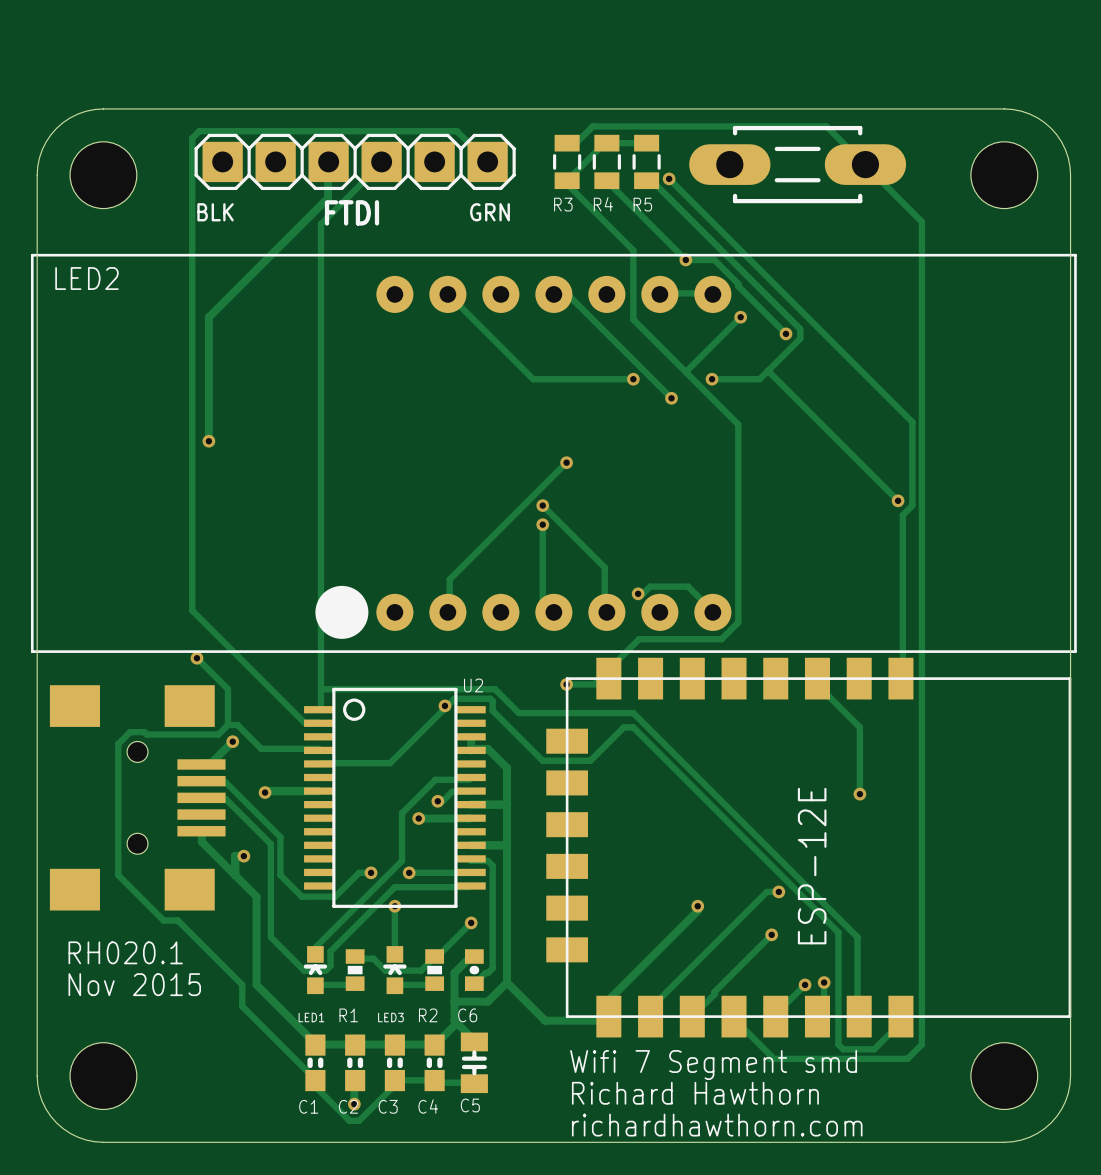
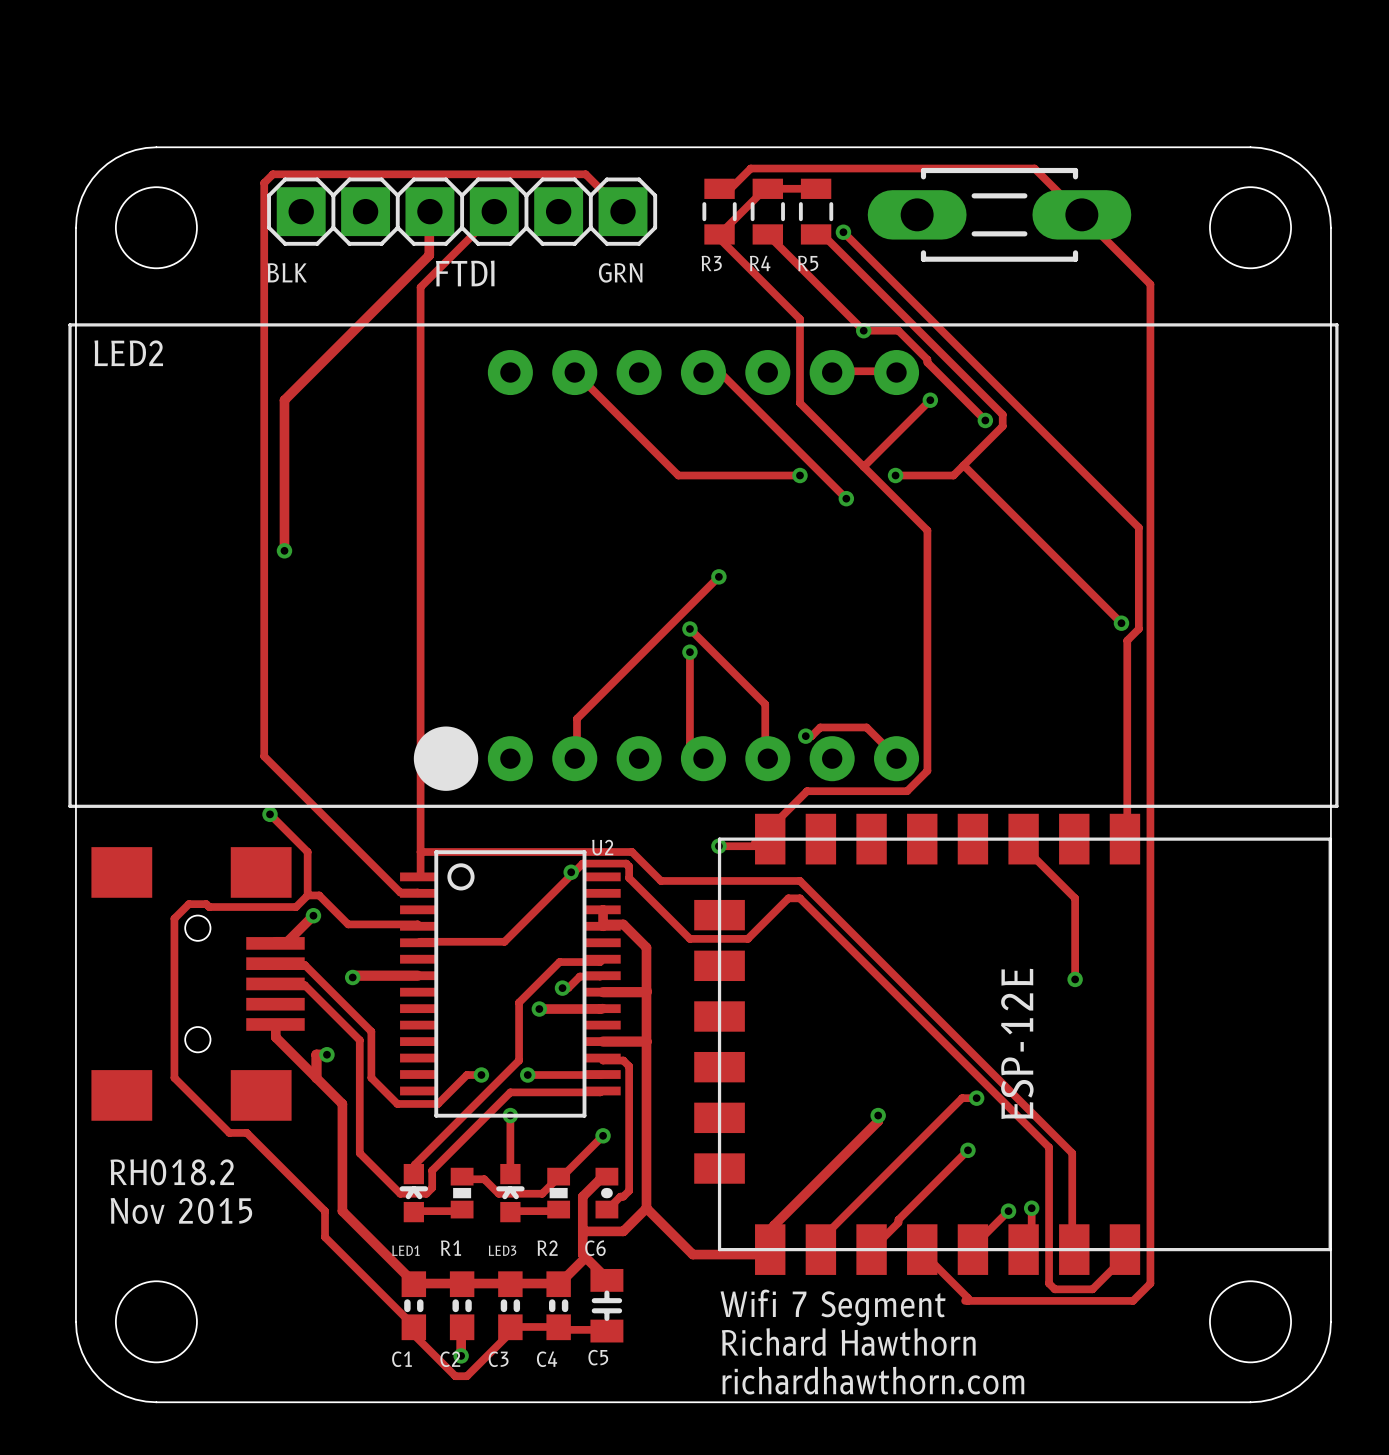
text: RH020.1 (125, 952) -> RH018.2 (172, 1172)
text: Wifi 7 Segment smd (713, 1065) -> Wifi 7 Segment (833, 1307)

